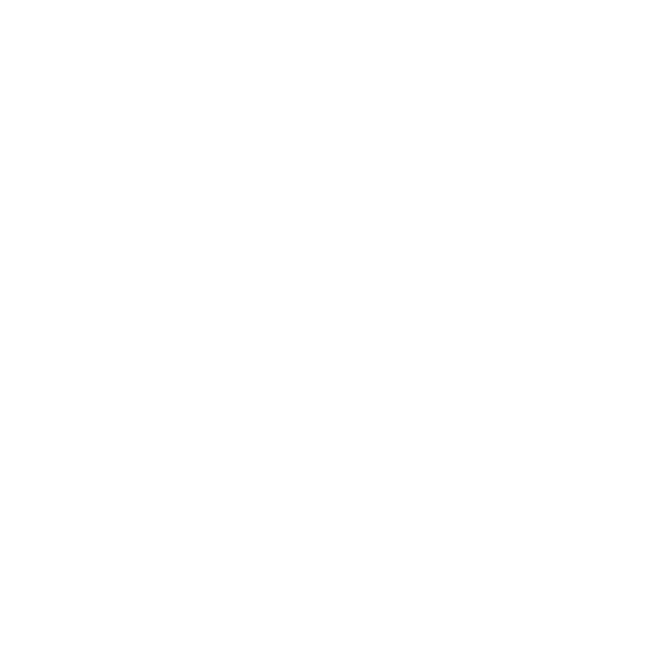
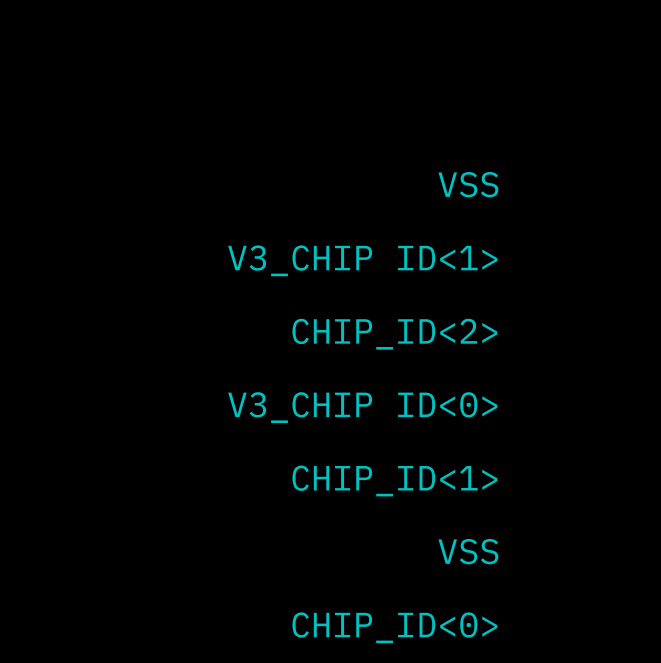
text: none -> VSS (468, 184)
text: none -> V3_CHIP ID<1> (362, 260)
text: none -> CHIP_ID<2> (394, 334)
text: none -> V3_CHIP ID<0> (362, 407)
text: none -> CHIP_ID<1> (394, 480)
text: none -> VSS (468, 551)
text: none -> CHIP_ID<0> (394, 627)

